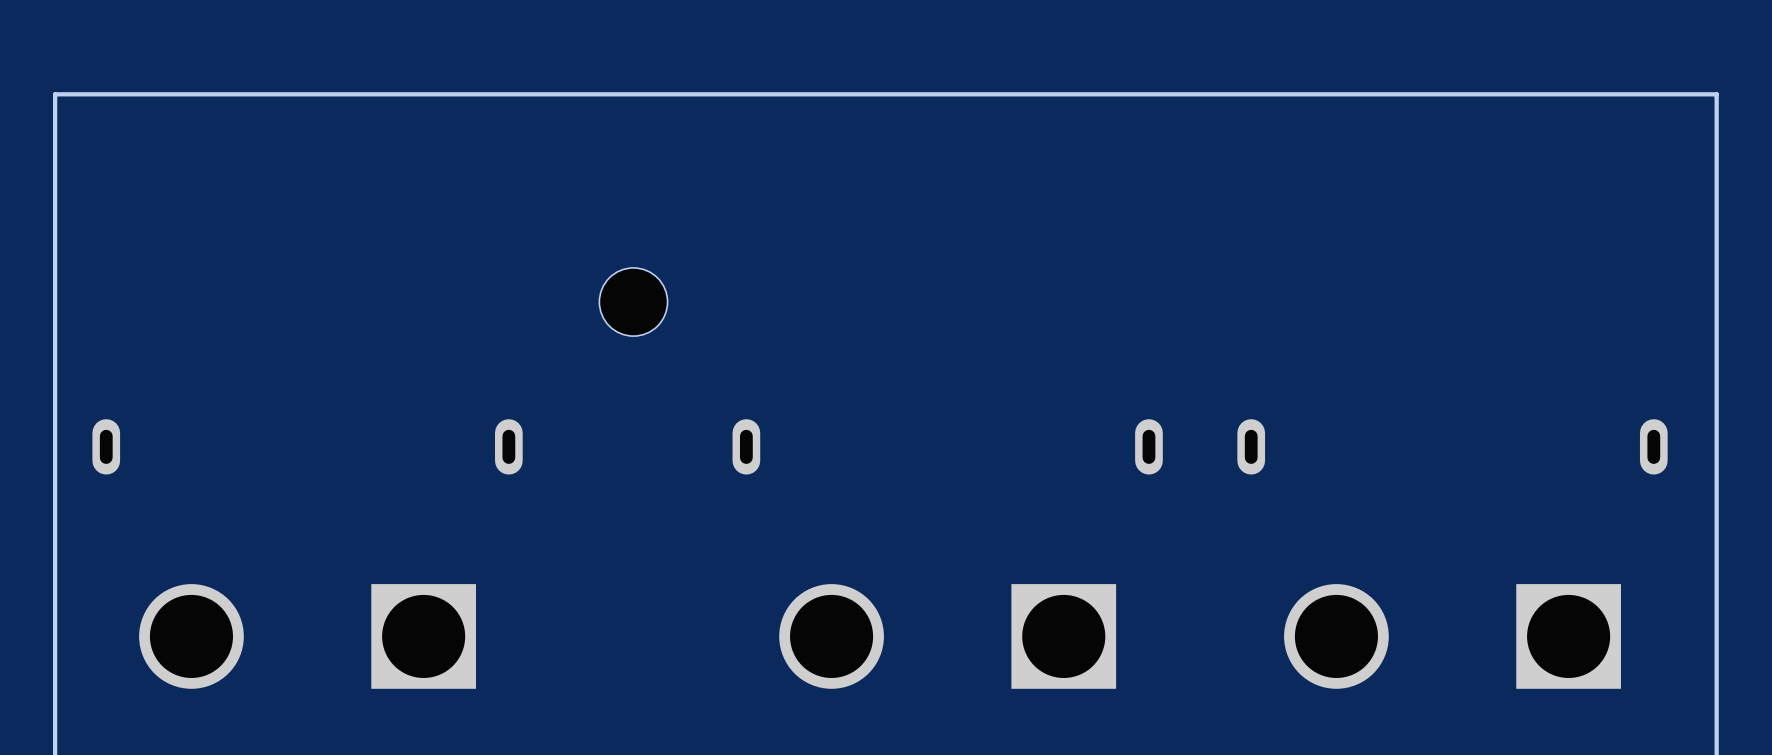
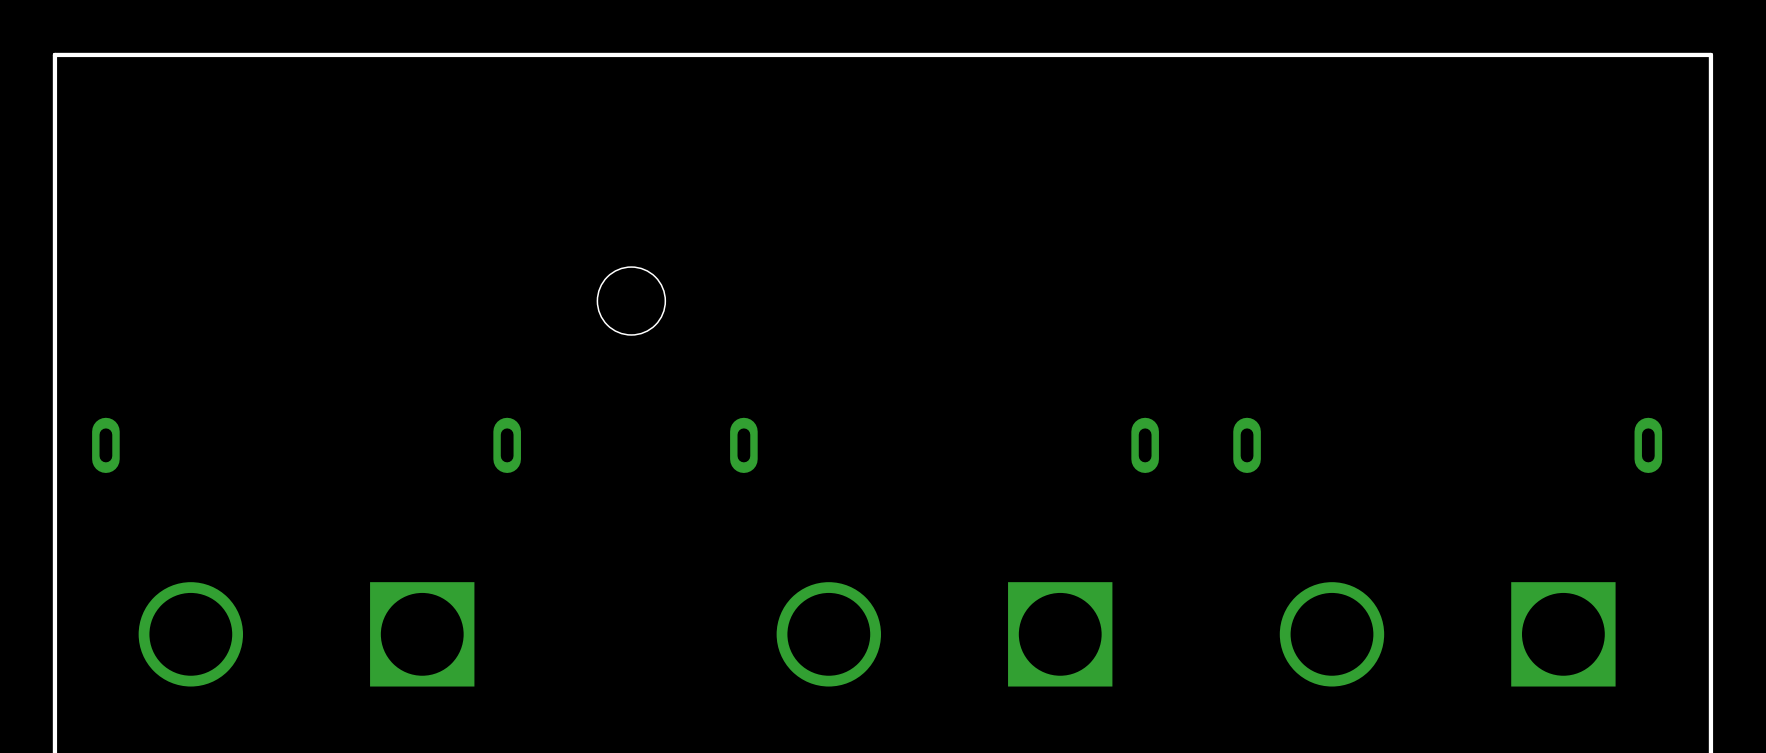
board edge: (1716, 94) (55, 94) -> (1710, 94) (1710, 54) (54, 54) (54, 94)

